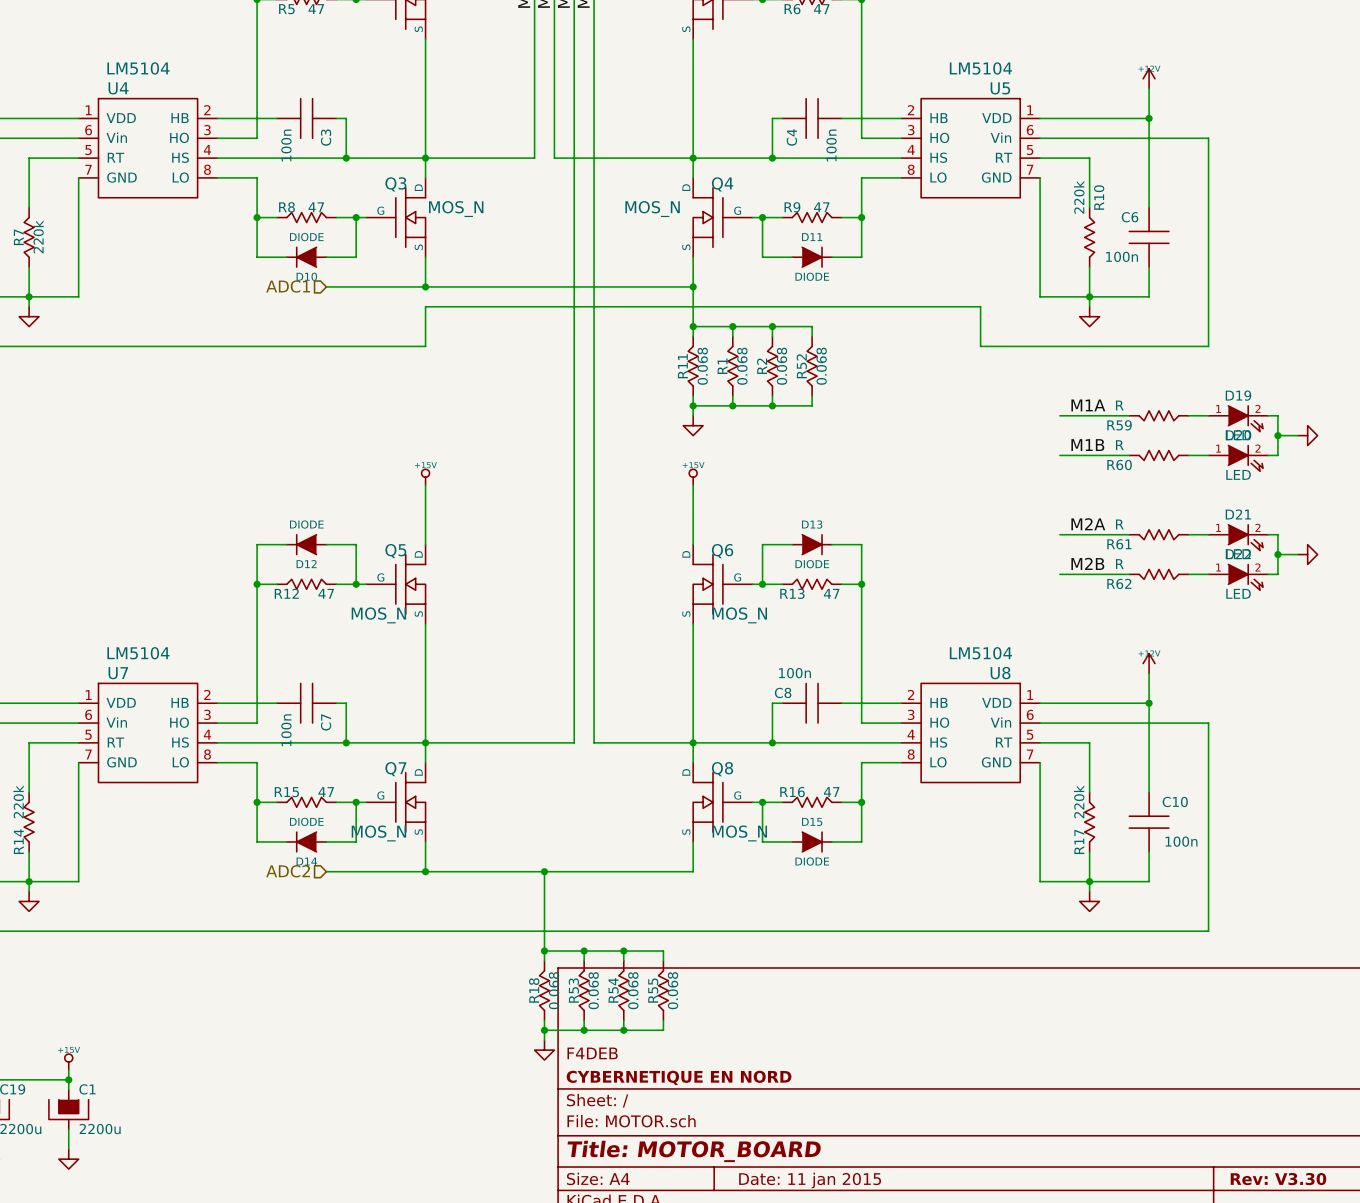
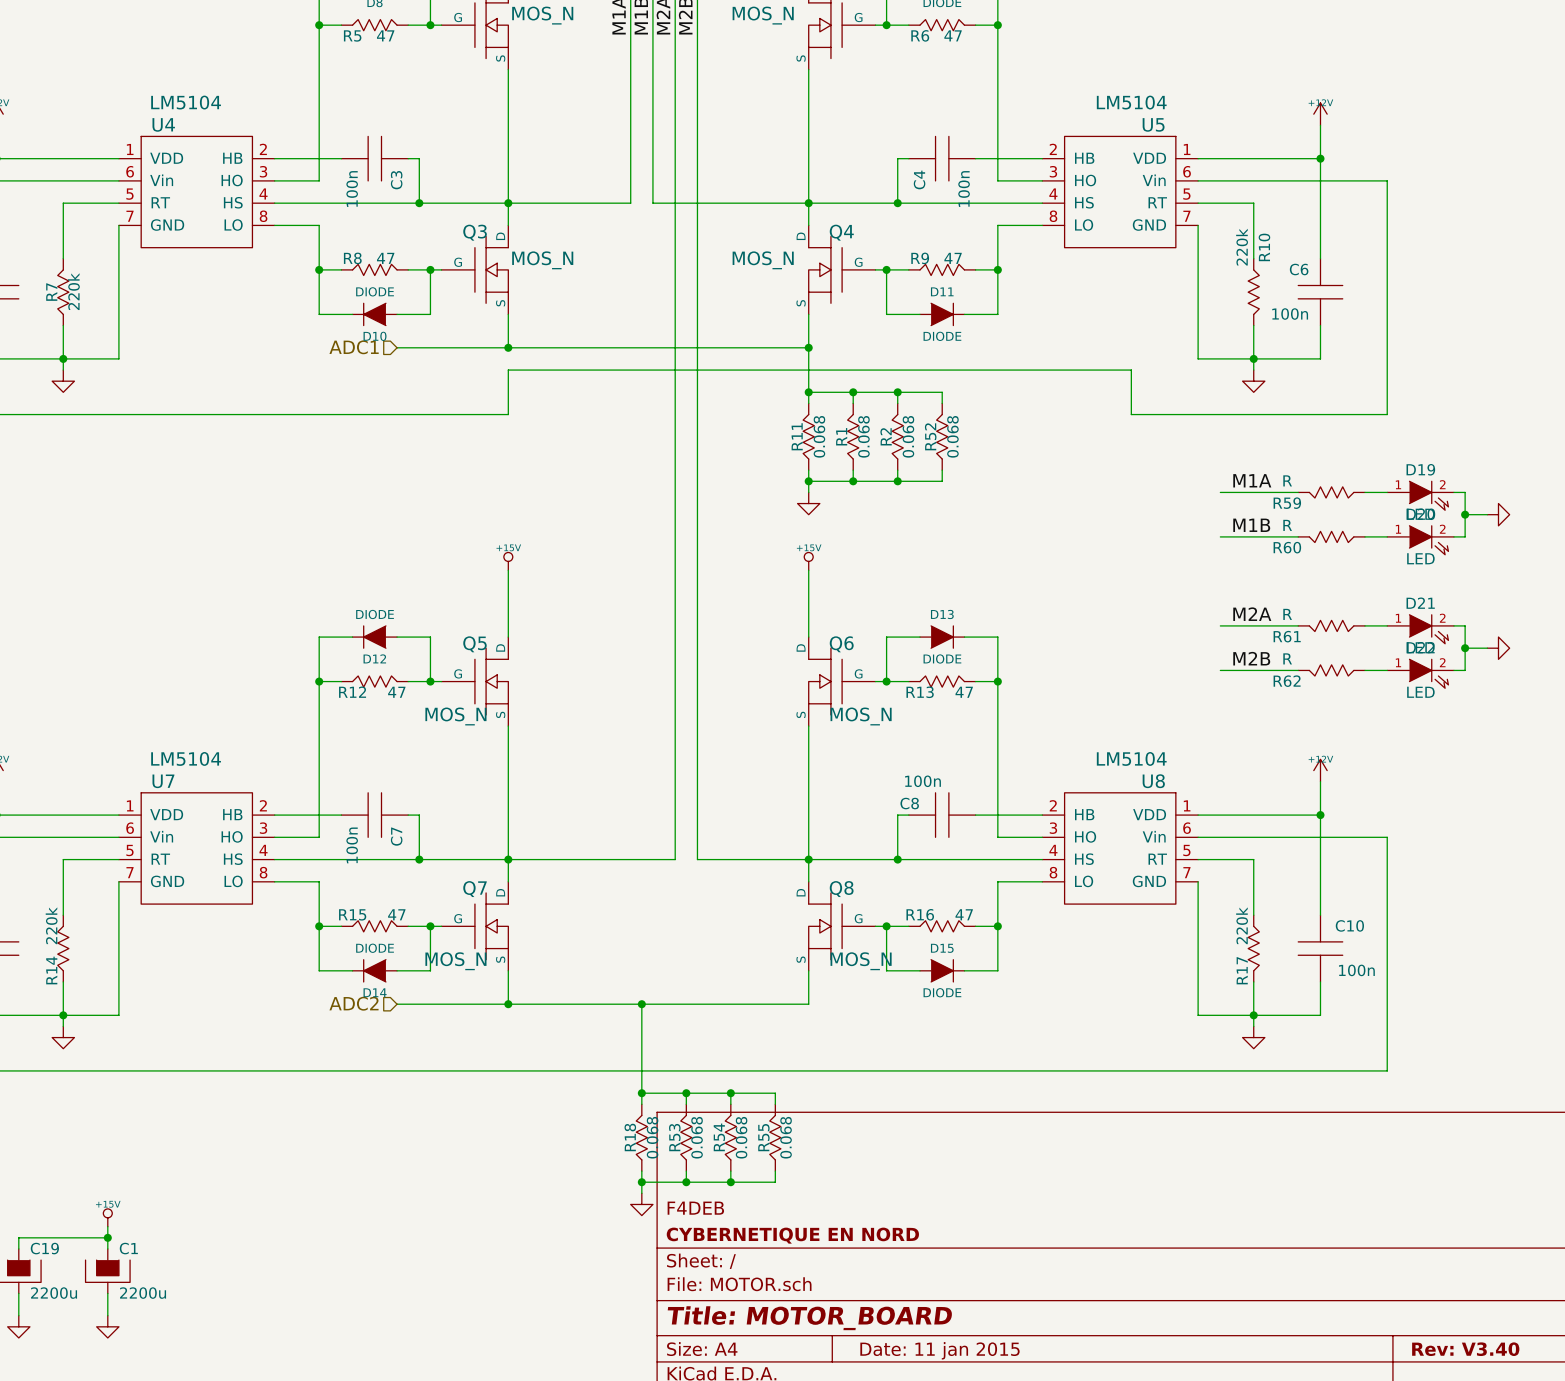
title block: Rev: V3.30 (1278, 1179) -> Rev: V3.40 (1465, 1349)

